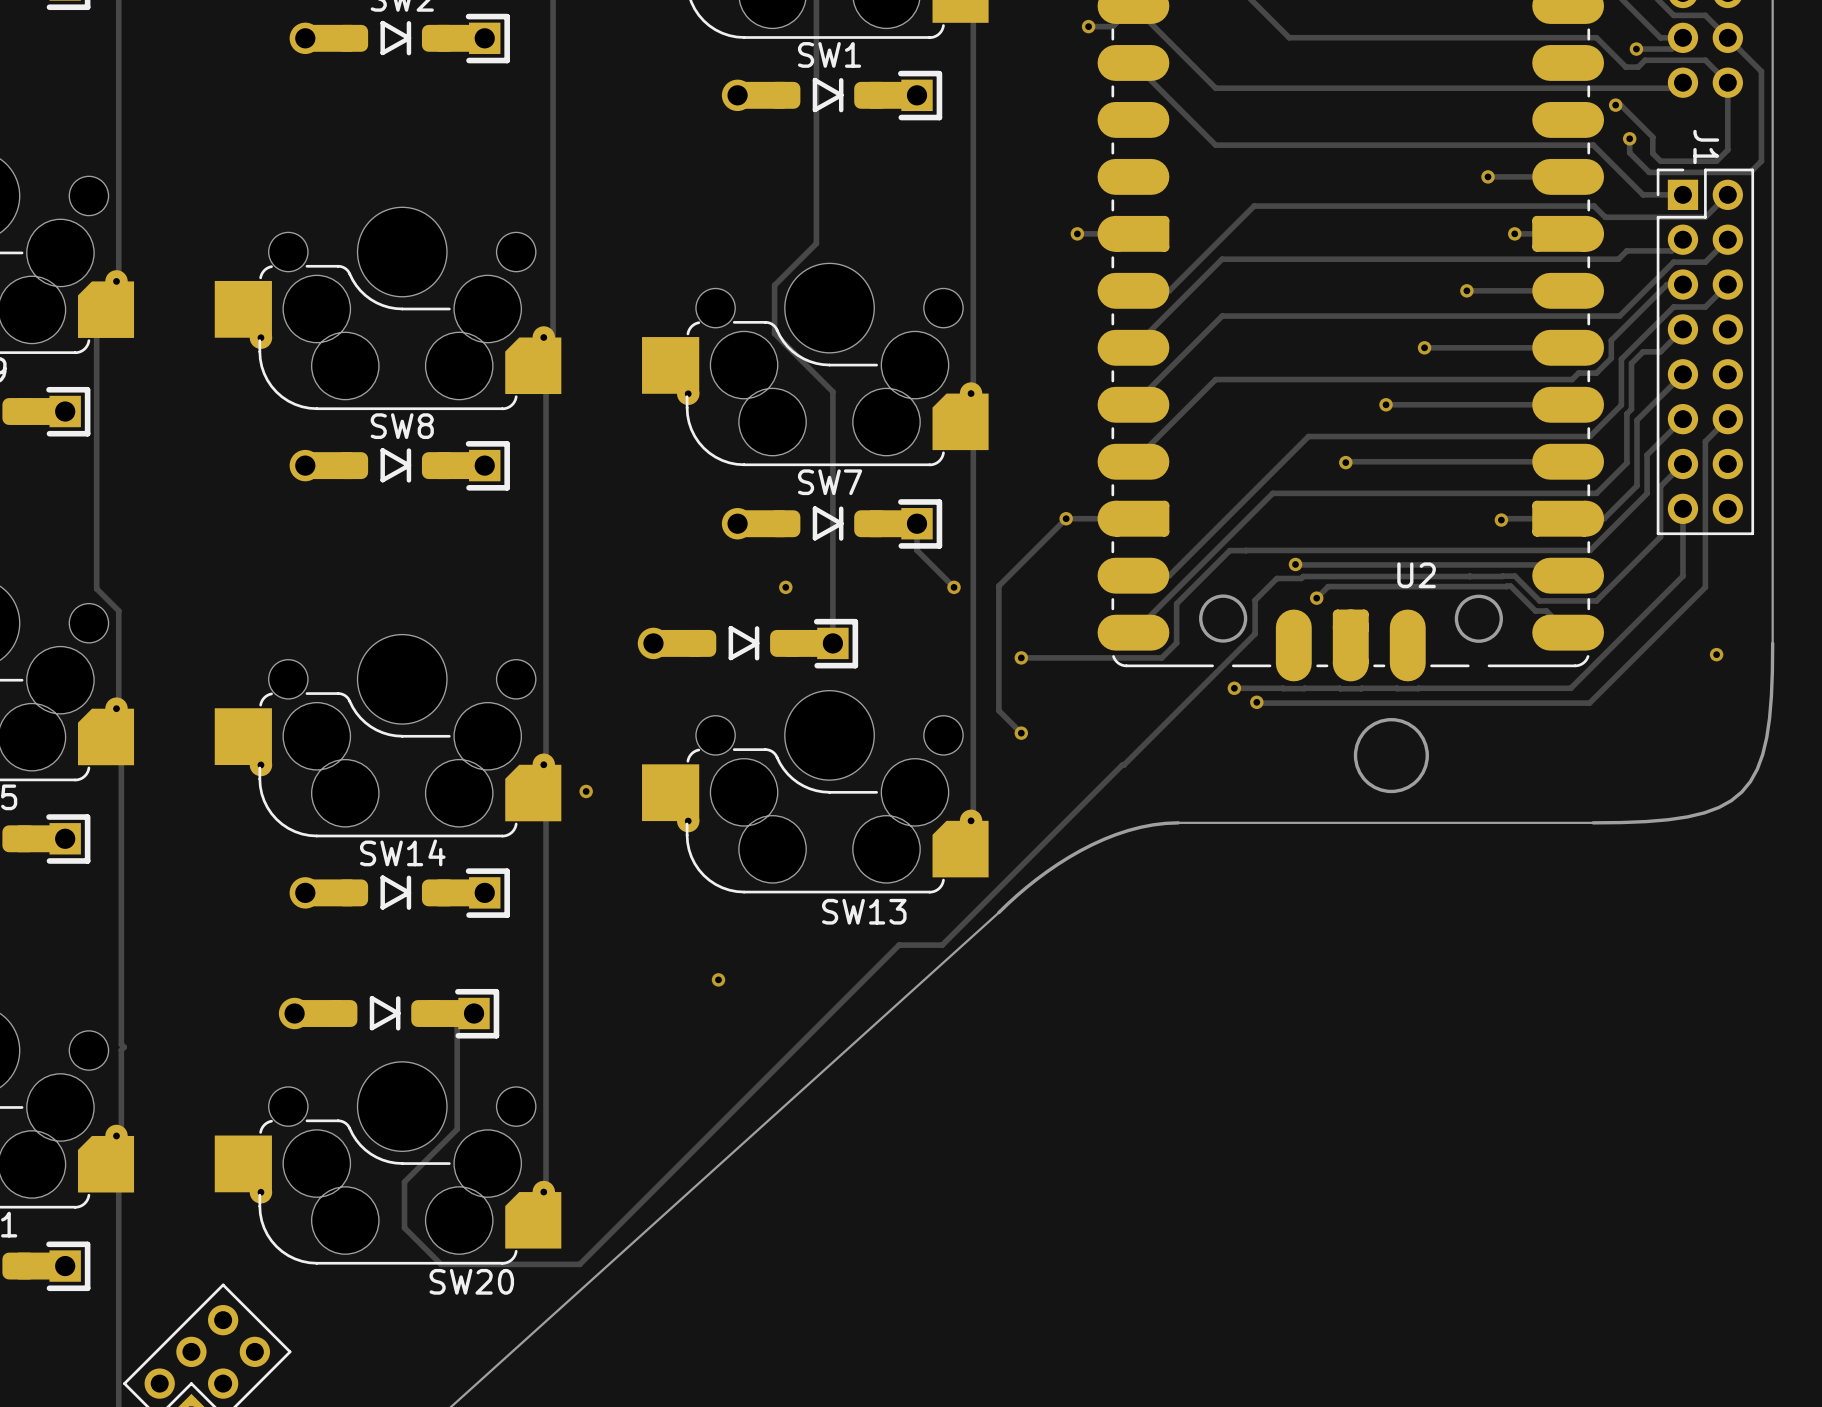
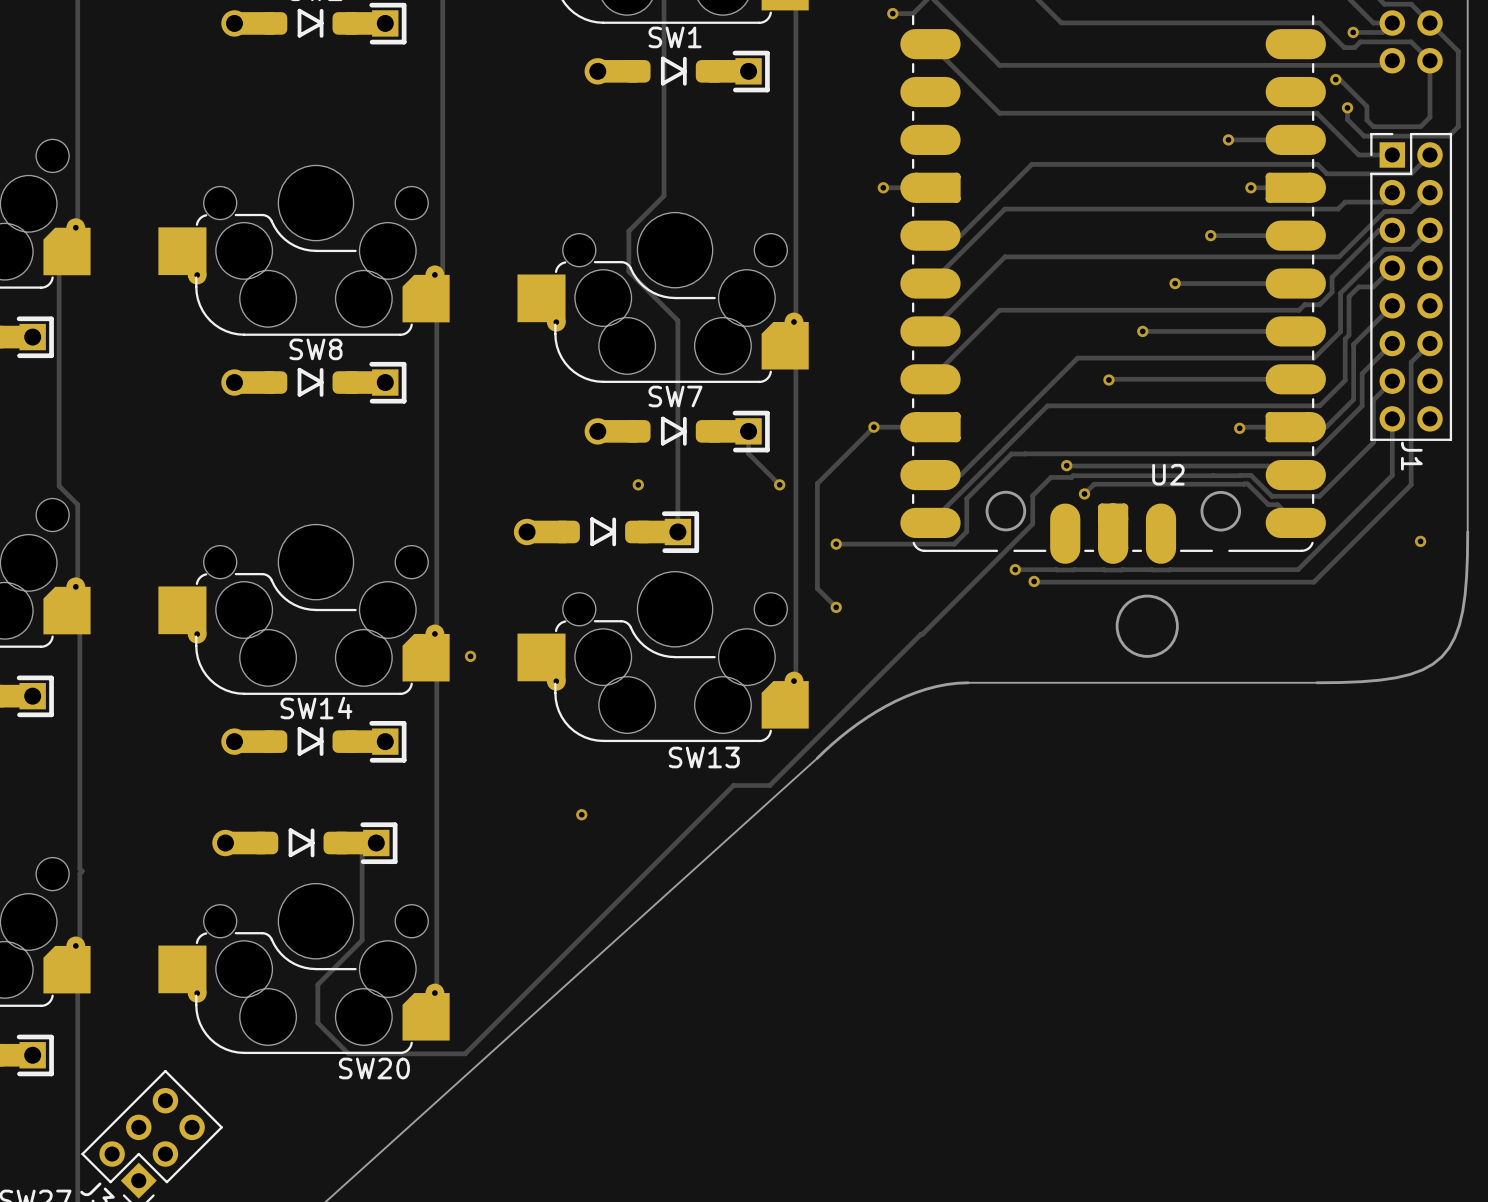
J1 name position: J1 (1706, 146) -> J1 (1411, 456)

